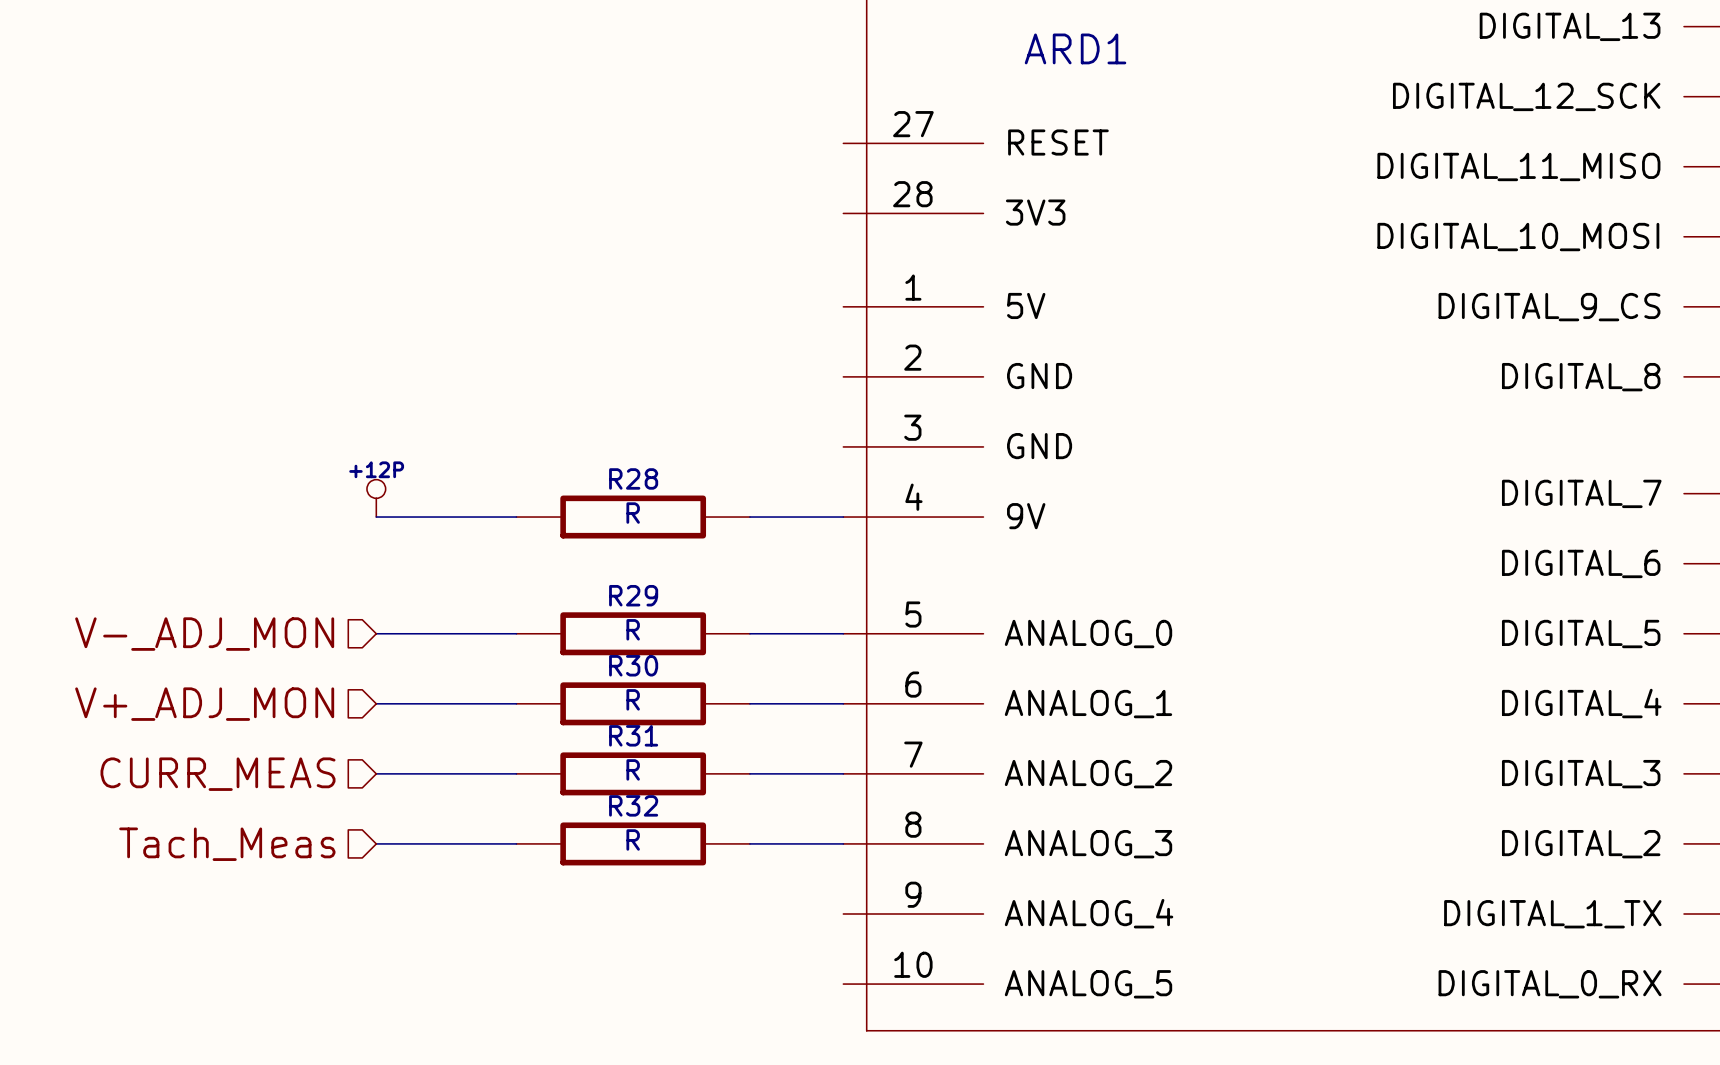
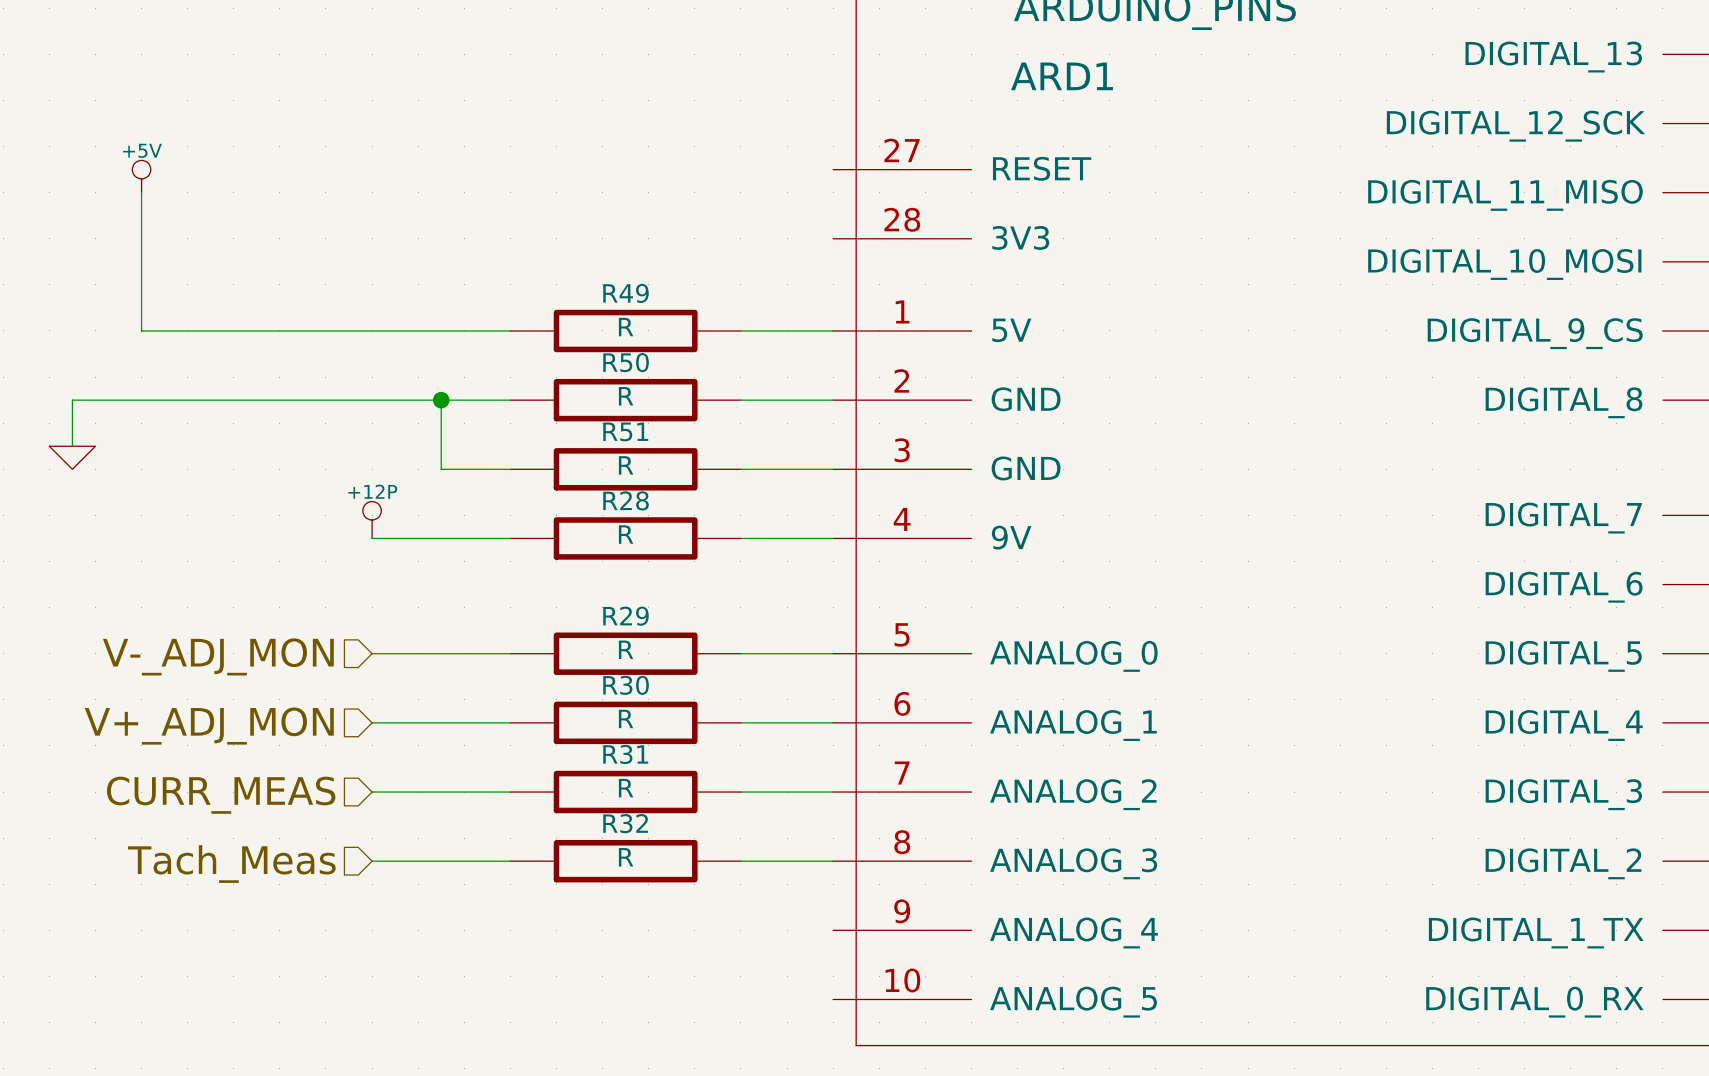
power symbol: none -> +5V (141, 176)
wire: none -> (141, 192) (141, 330) (510, 330)
R49: none -> R (625, 330)
wire: none -> (740, 330) (833, 330)
wire: none -> (441, 400) (441, 469) (510, 469)
junction: none -> (441, 400)
wire: none -> (510, 400) (72, 400) (72, 446)
R50: none -> R (625, 400)
wire: none -> (740, 400) (833, 400)
power symbol: none -> (72, 457)
R51: none -> R (625, 469)
wire: none -> (740, 469) (833, 469)

